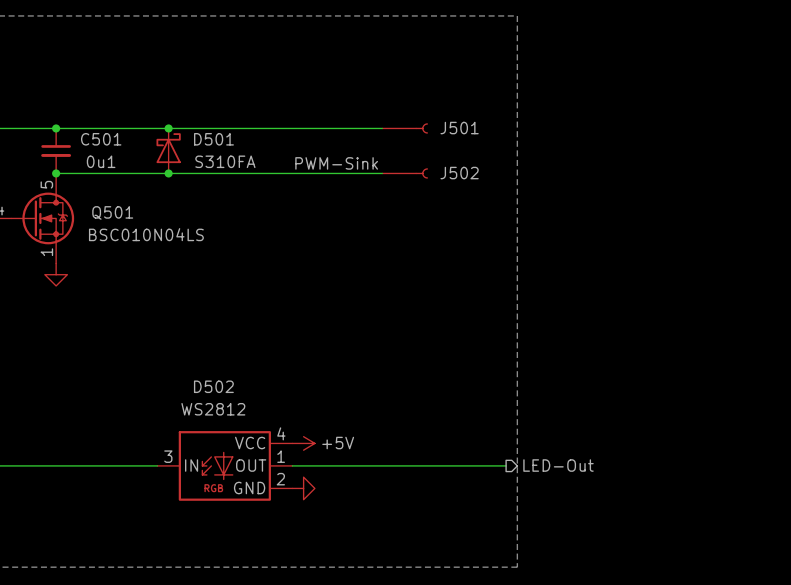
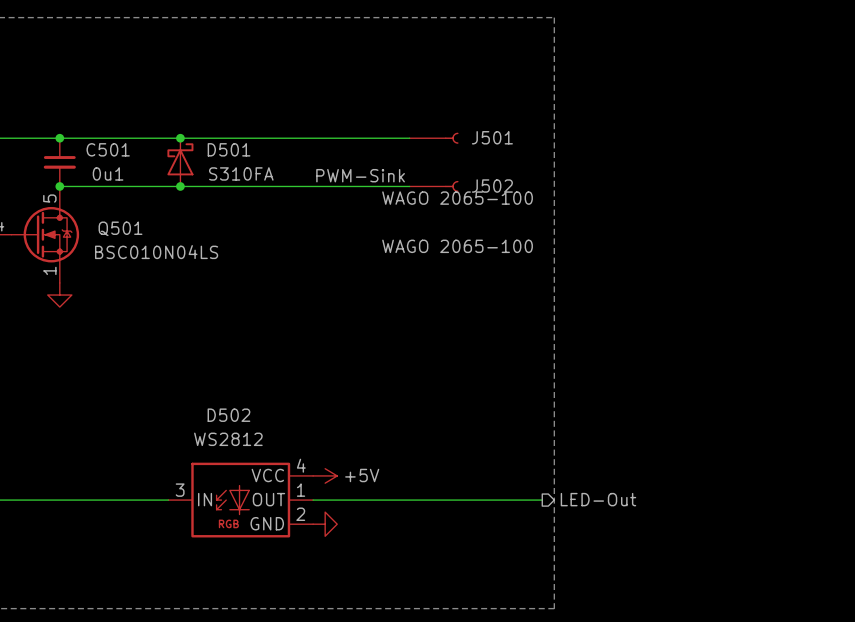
J501 value: none -> WAGO 2065-100 (457, 198)
J502 value: none -> WAGO 2065-100 (457, 246)

